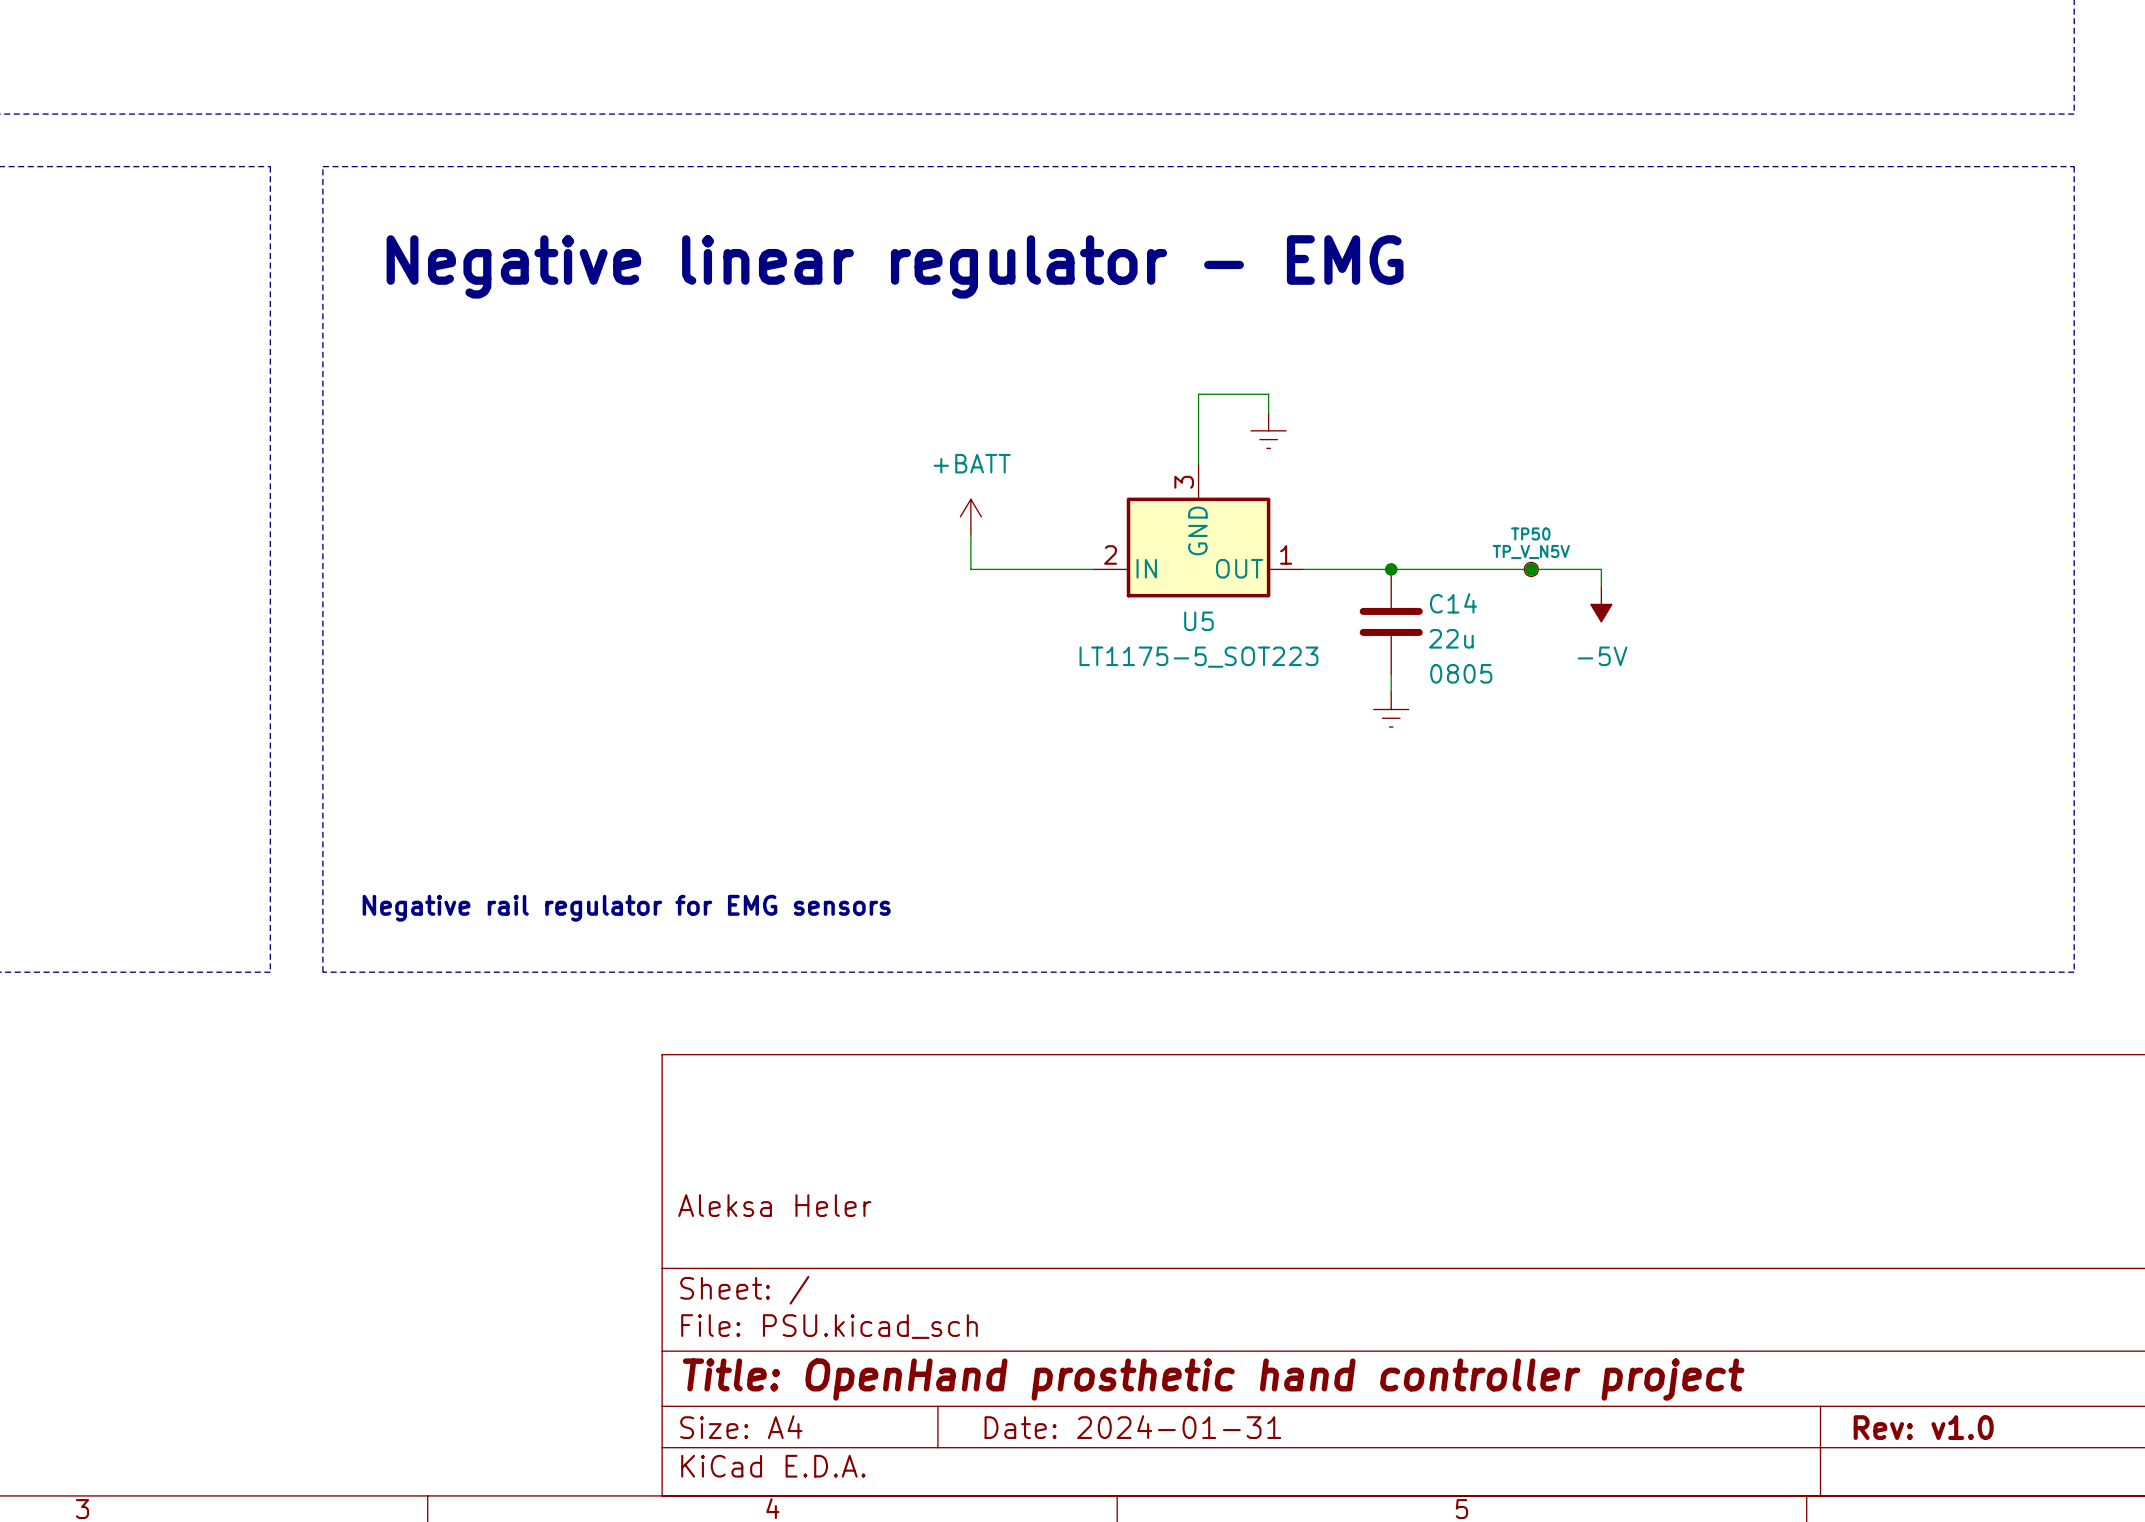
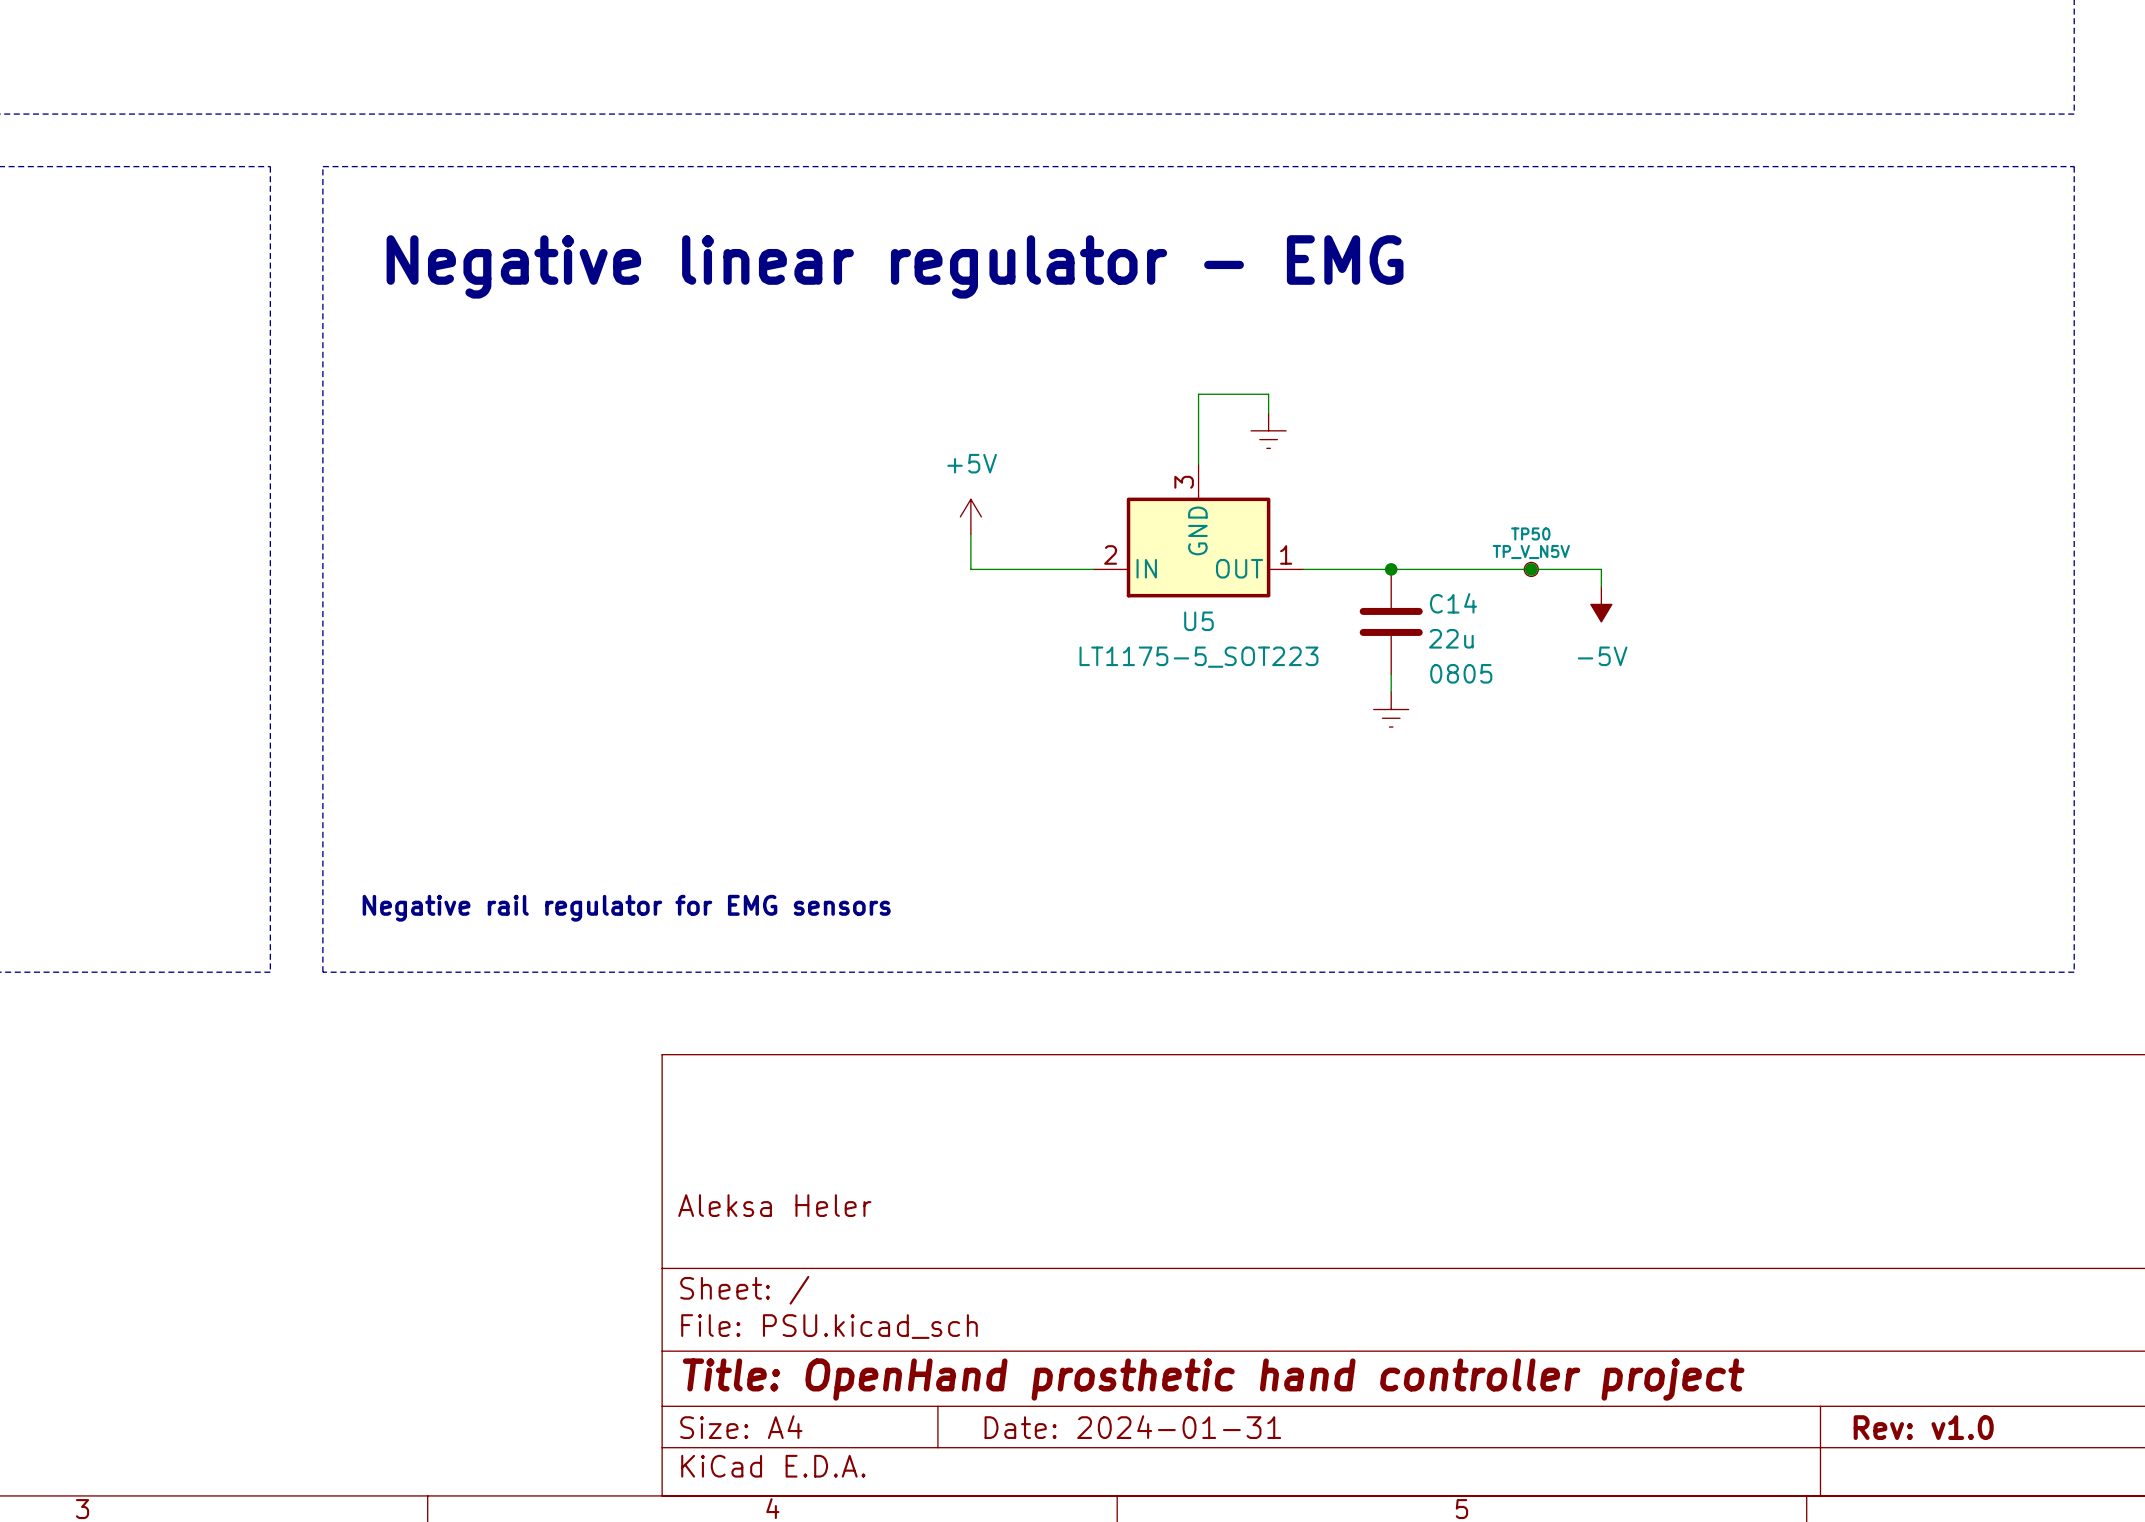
power symbol: +BATT (970, 516) -> +5V (970, 516)

